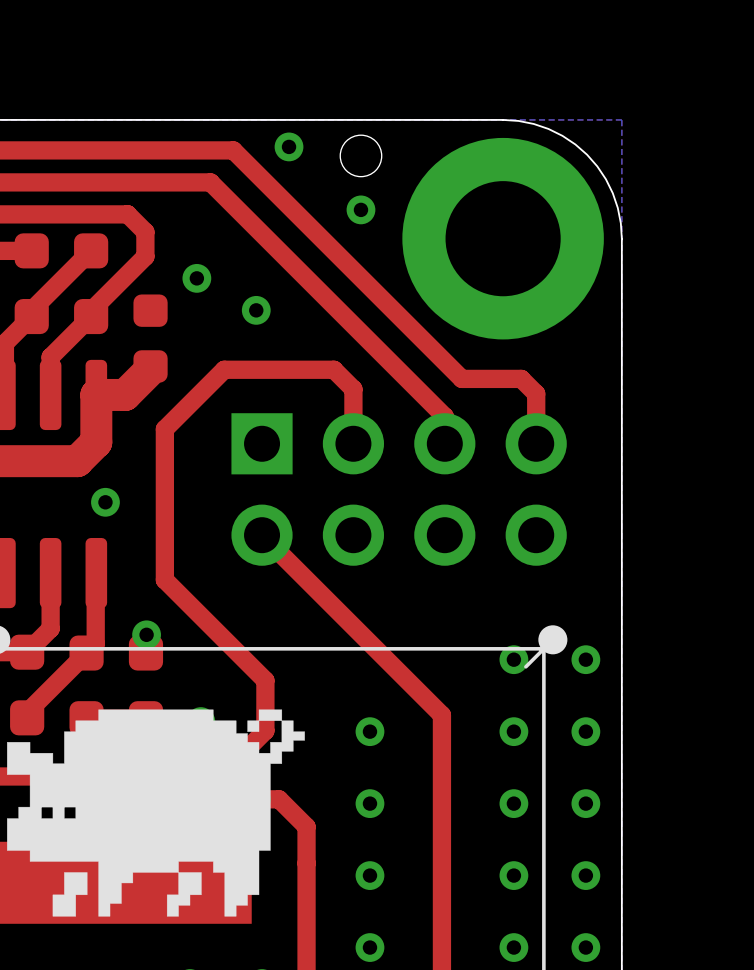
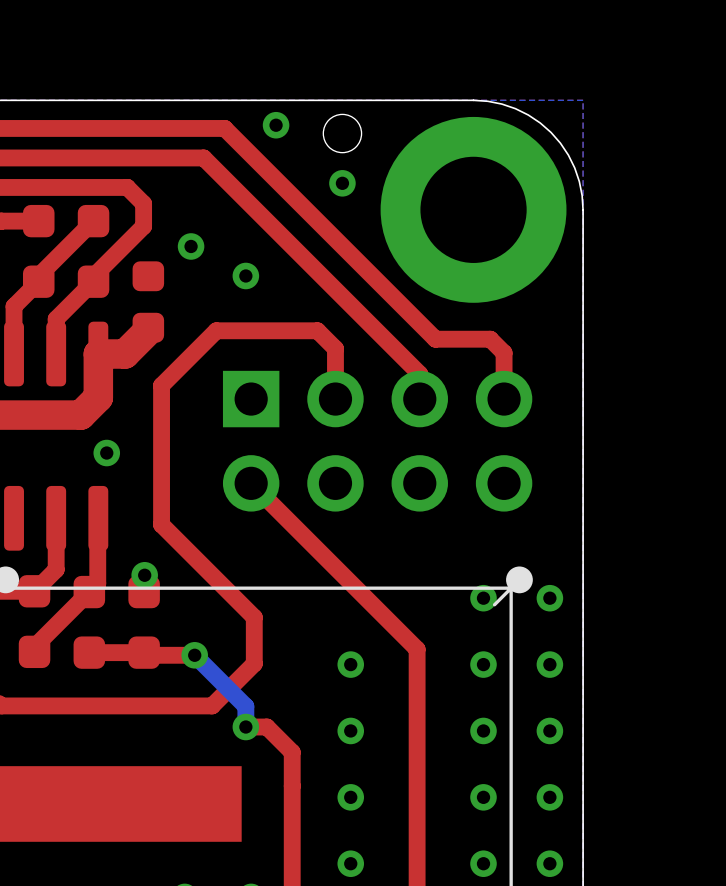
drawing: [7, 709, 305, 917] -> none

